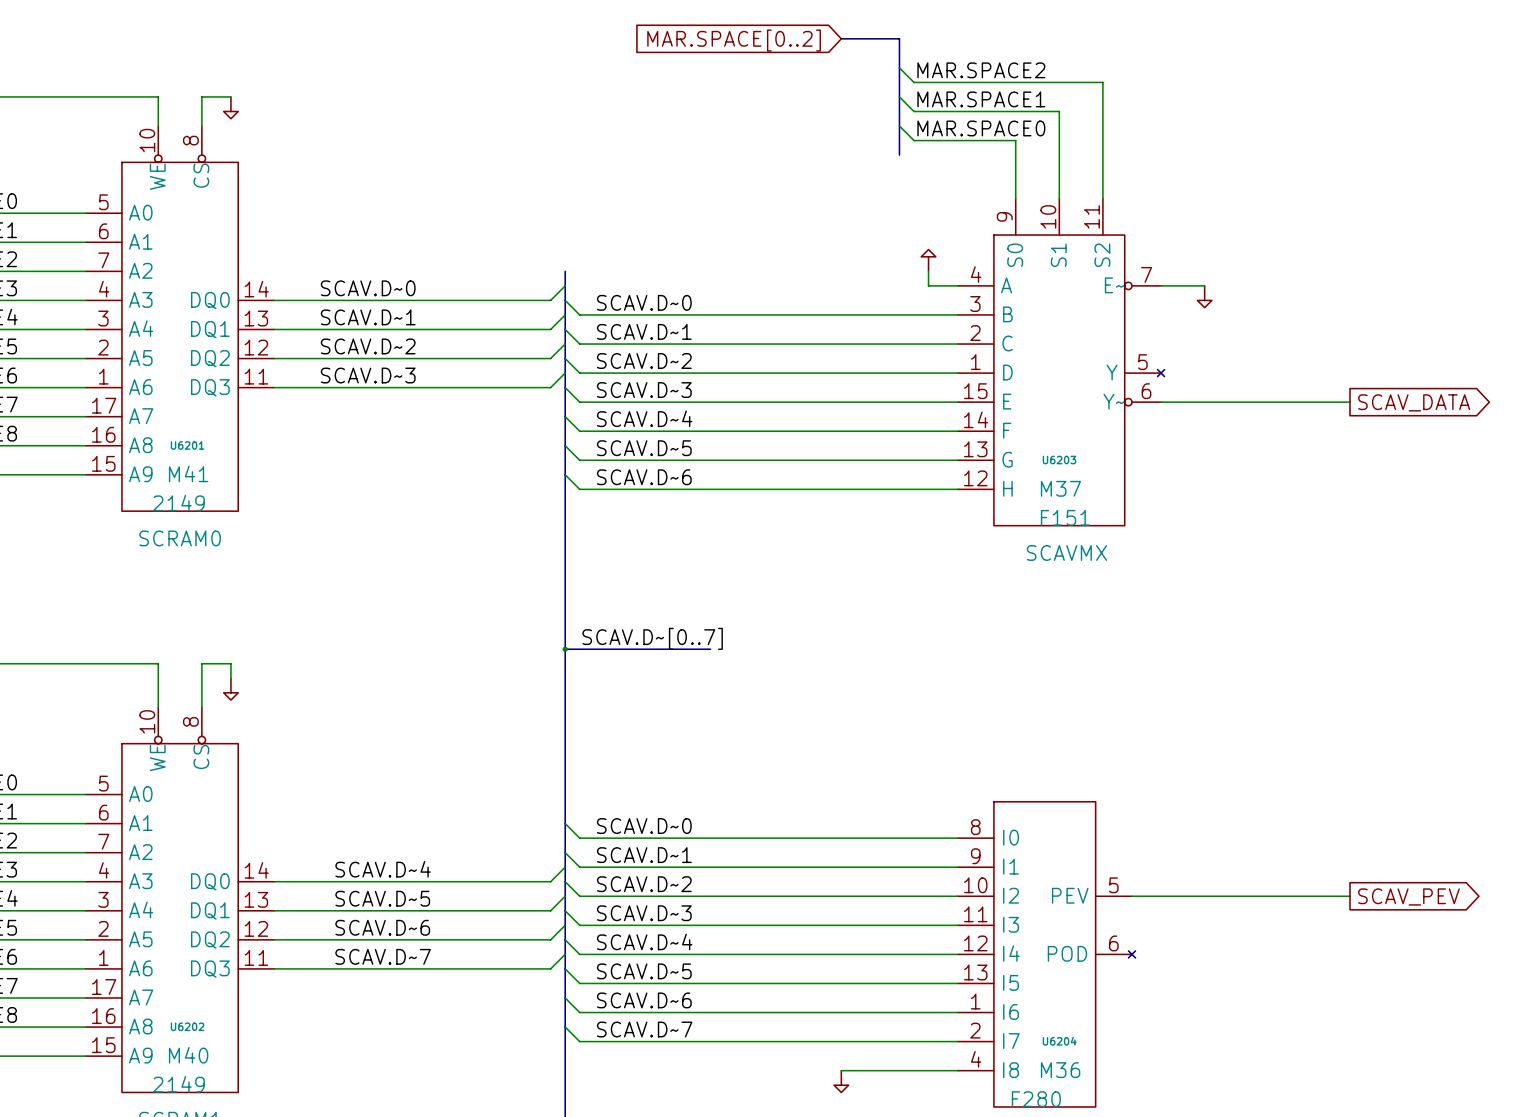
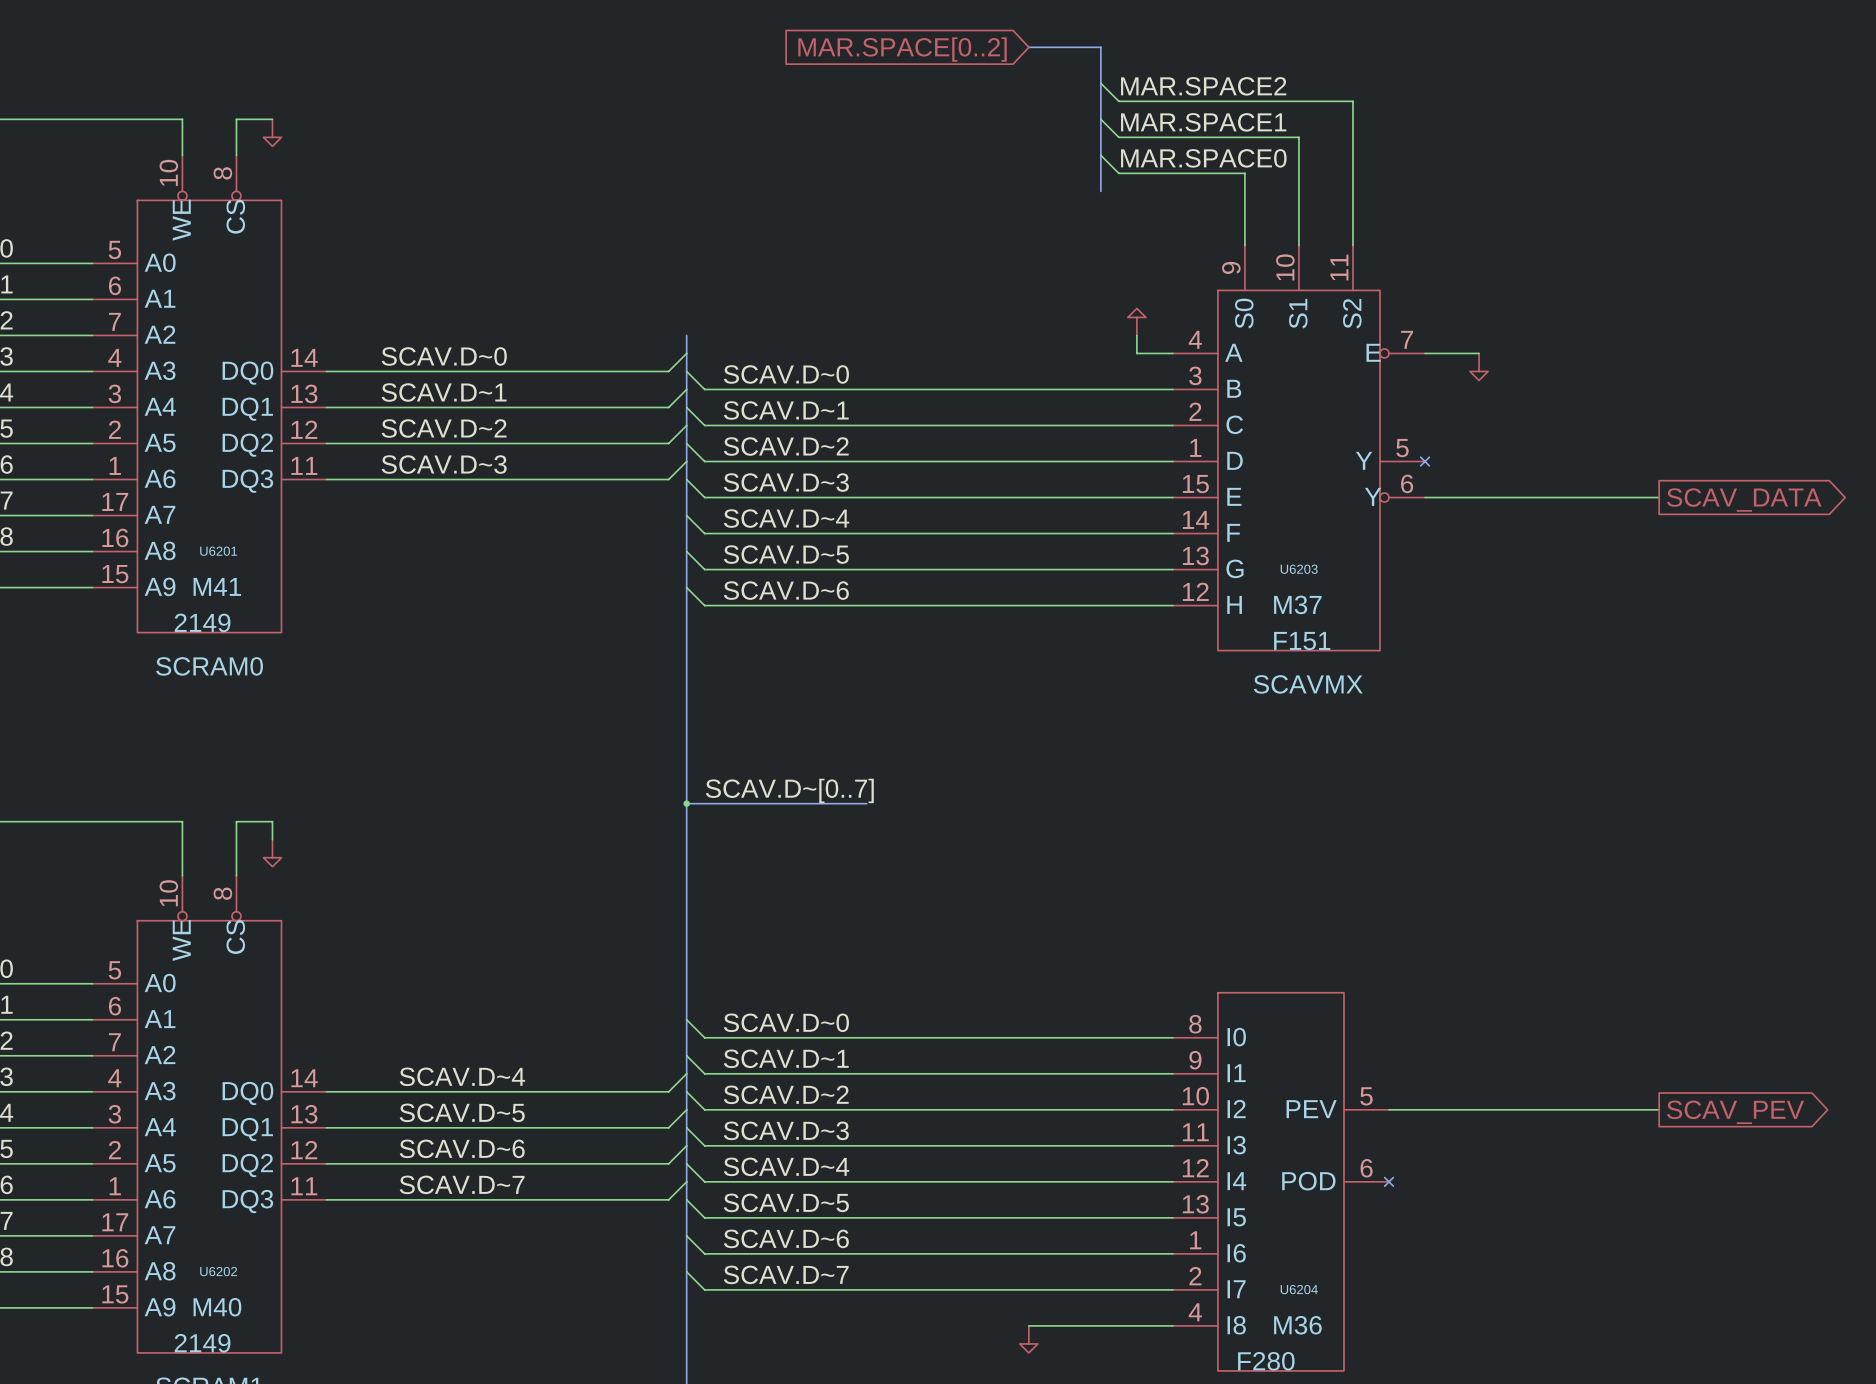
U6203 pin name: E~ (1114, 285) -> E (1373, 352)
U6203 pin name: Y~ (1113, 401) -> Y (1373, 496)

